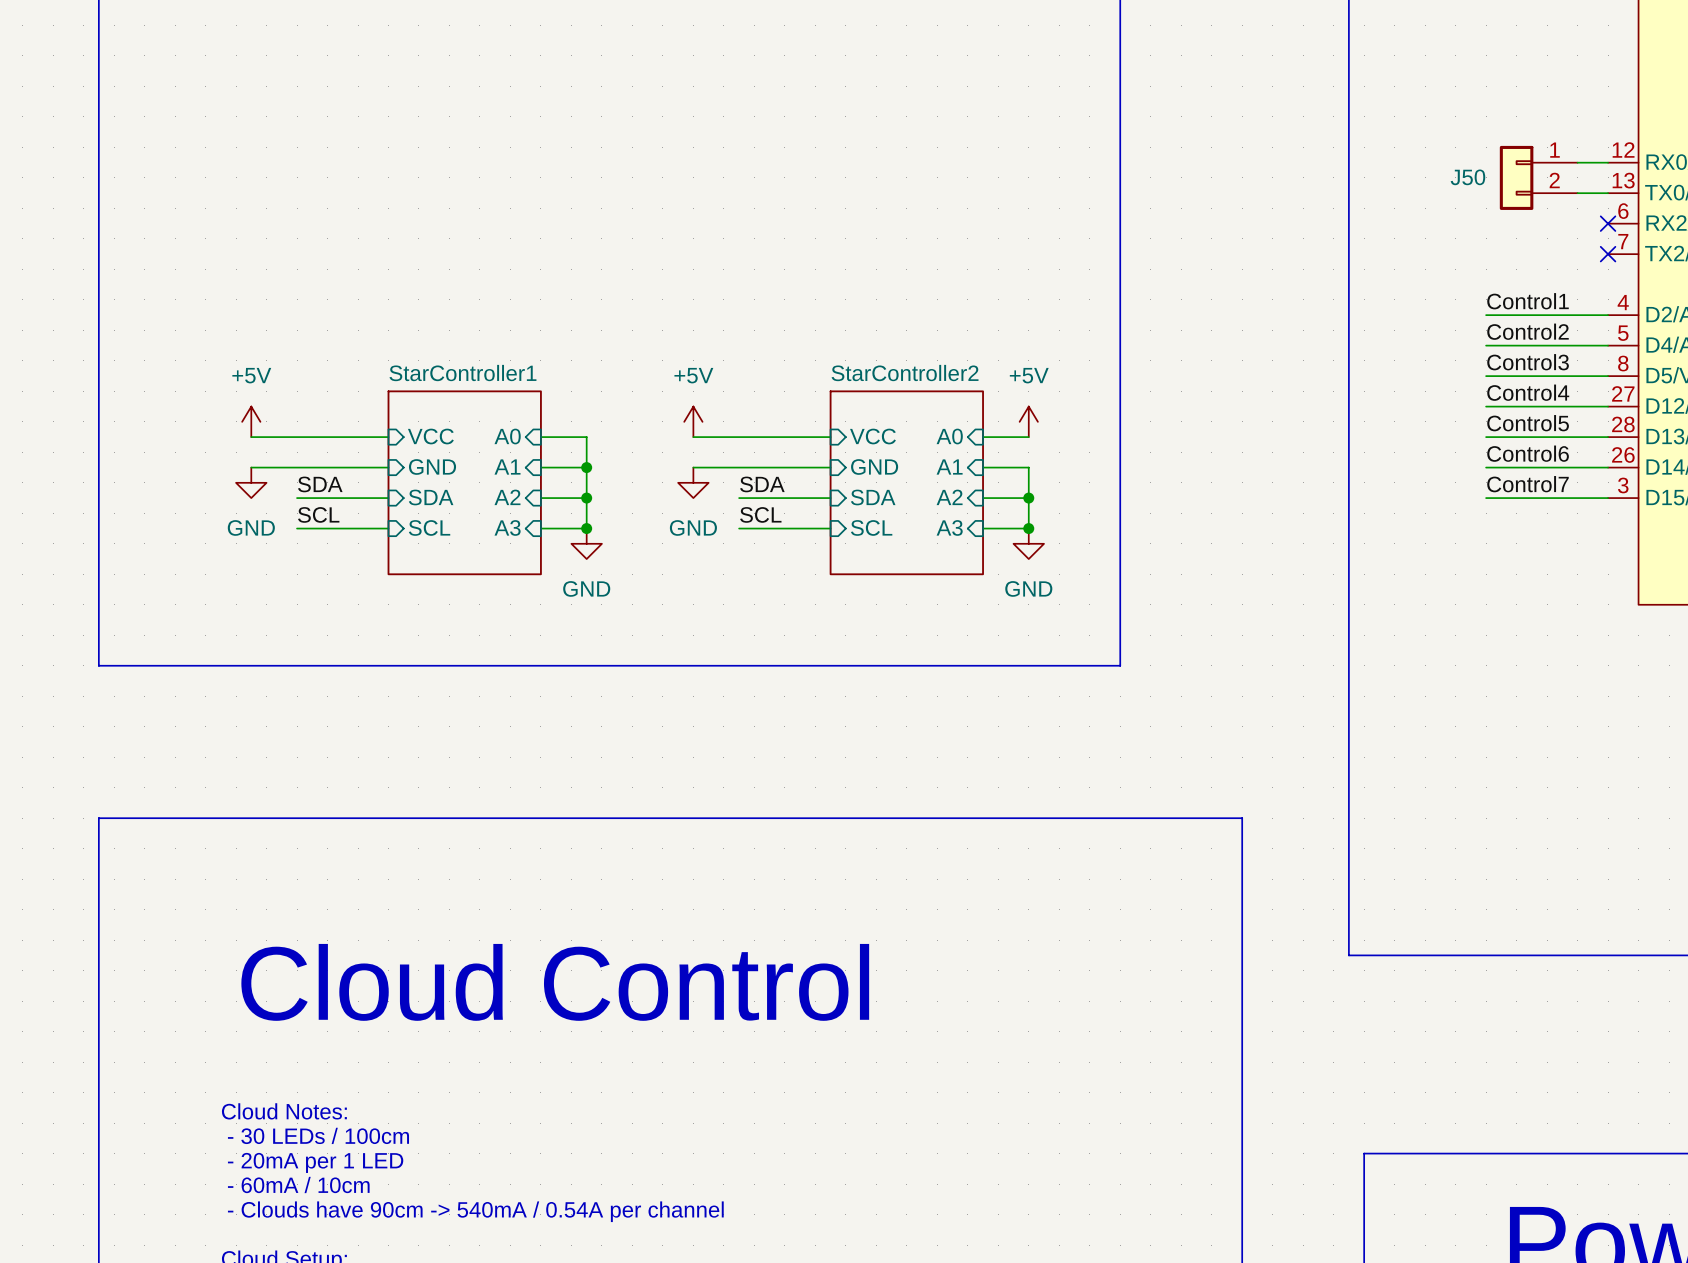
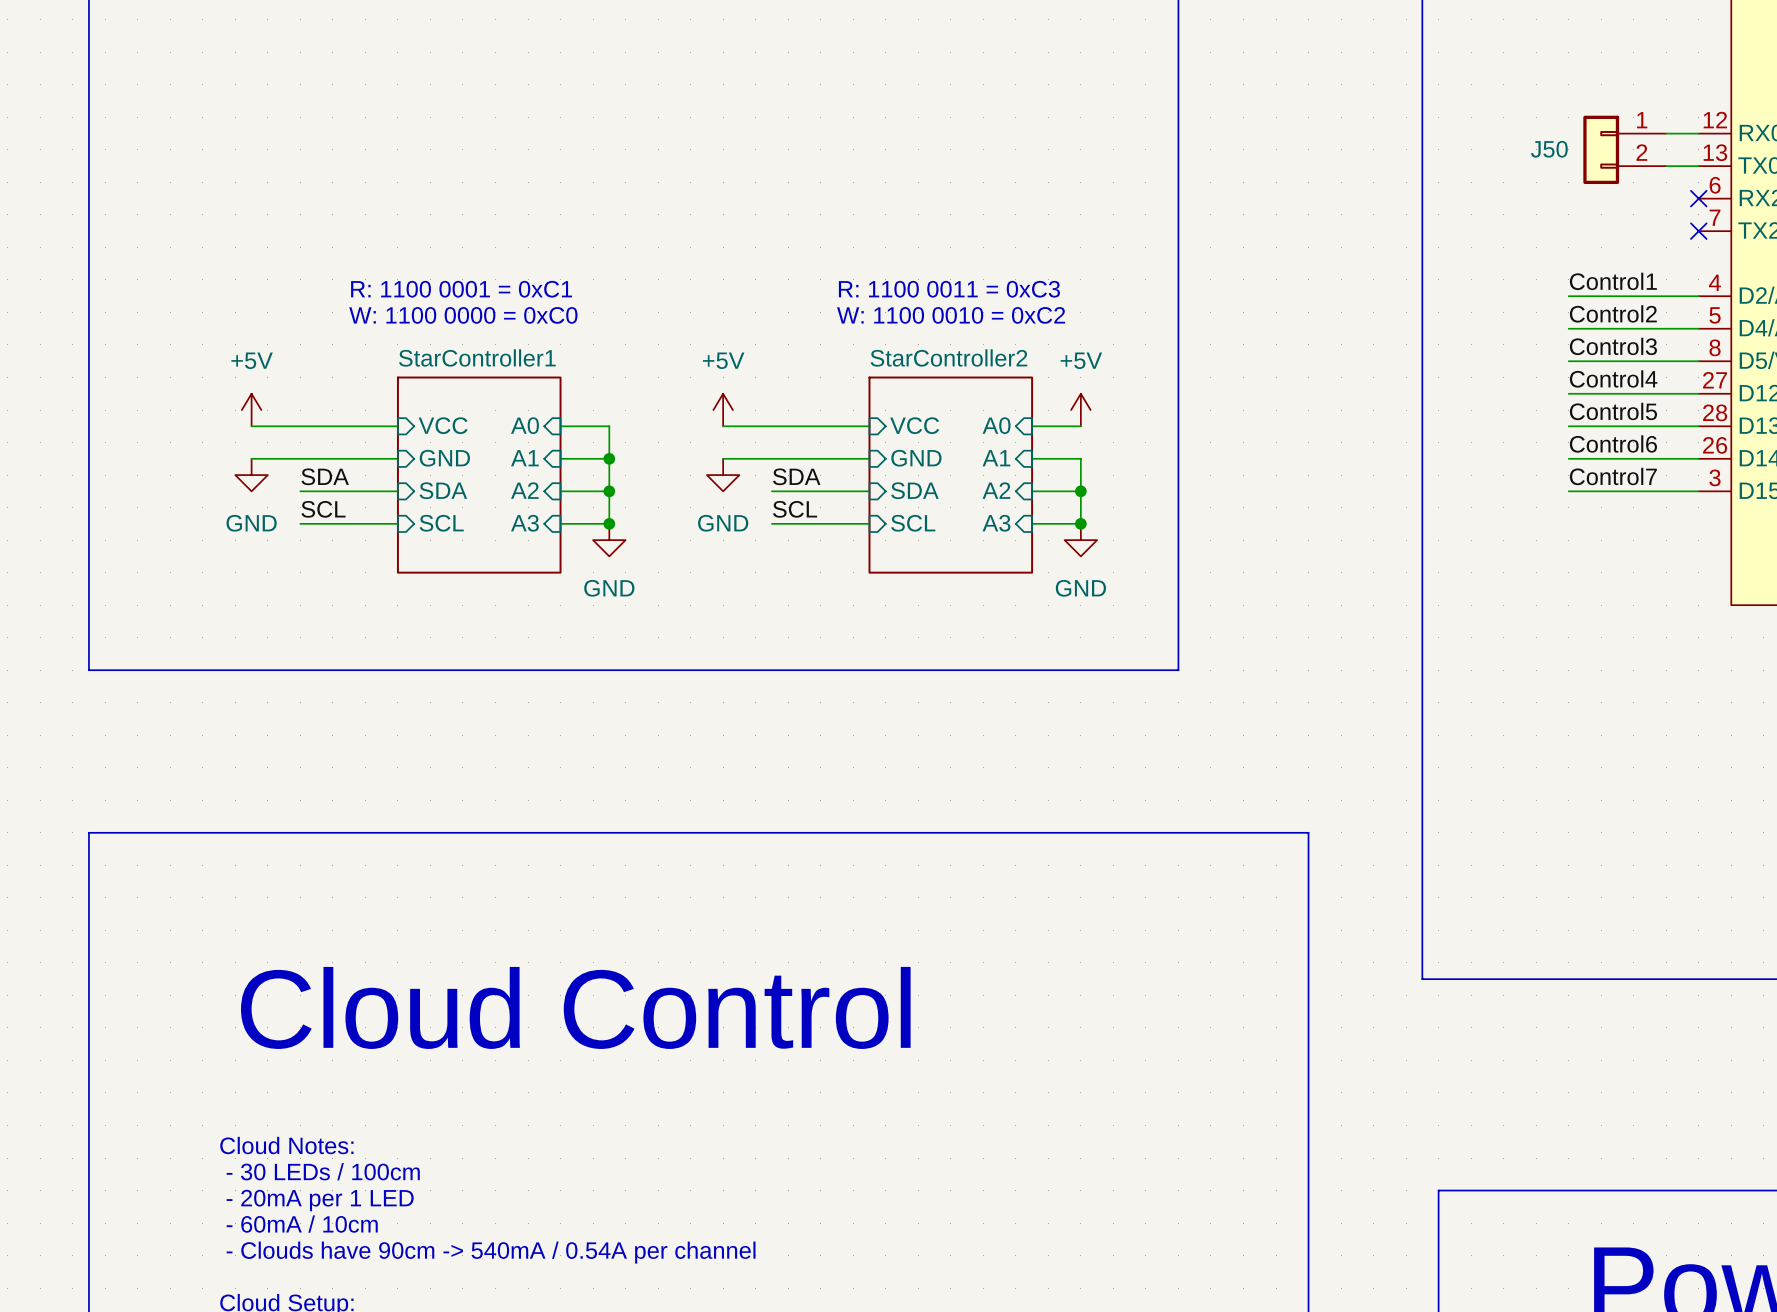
text: none -> R: 1100 0001 = 0xC1 (461, 289)
text: none -> R: 1100 0011 = 0xC3 (949, 289)
text: none -> W: 1100 0000 = 0xC0 (463, 315)
text: none -> W: 1100 0010 = 0xC2 (951, 315)

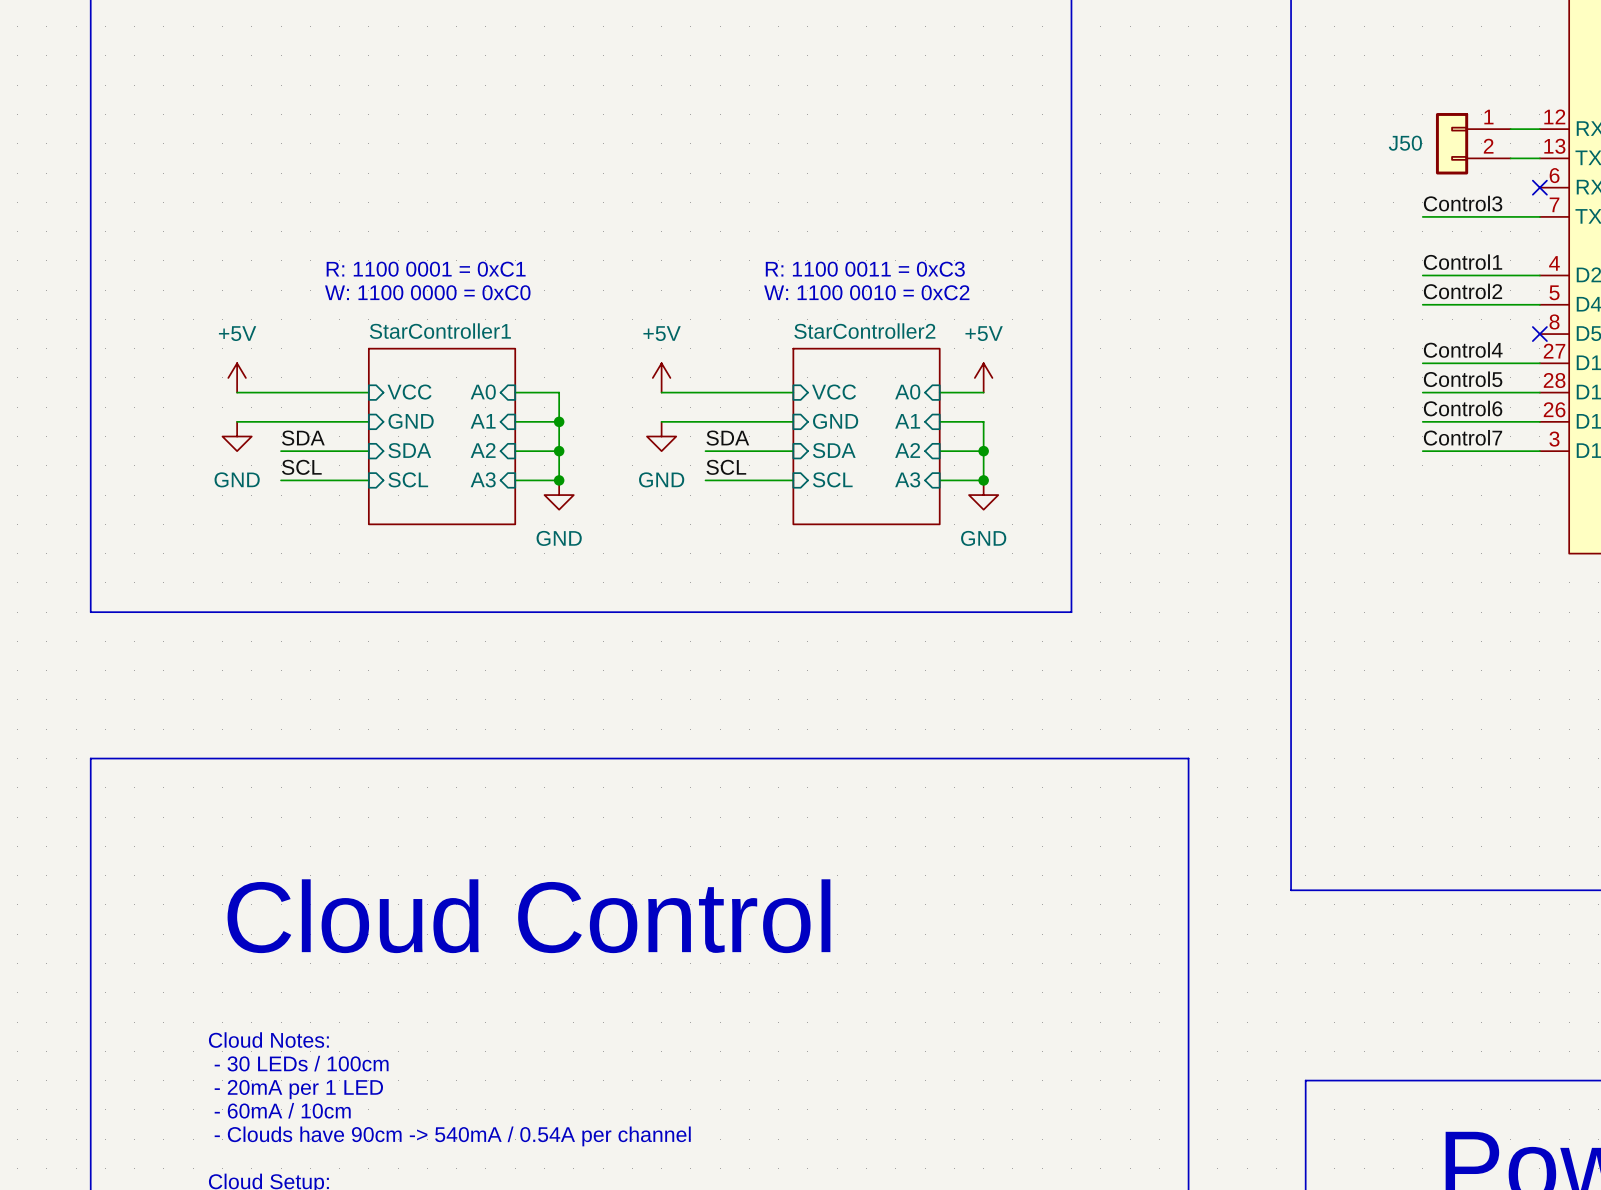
no-connect mark: (1698, 231) -> none
label position: Control3 (1613, 346) -> Control3 (1463, 203)
wire: (1568, 361) (1698, 361) -> (1422, 216) (1539, 216)
no-connect mark: none -> (1539, 334)

